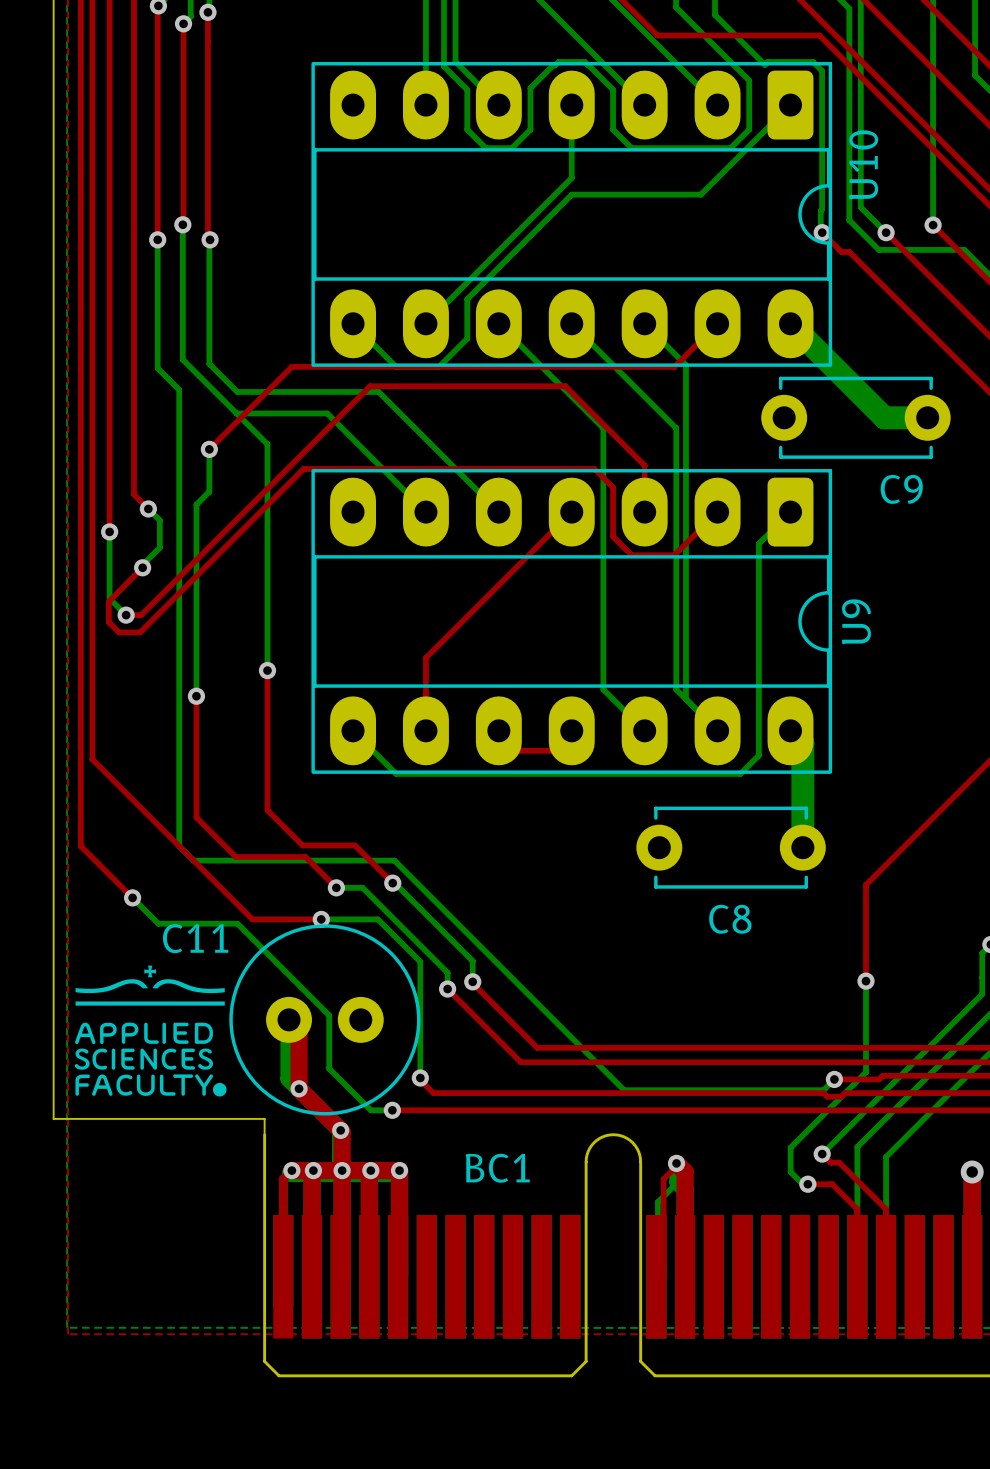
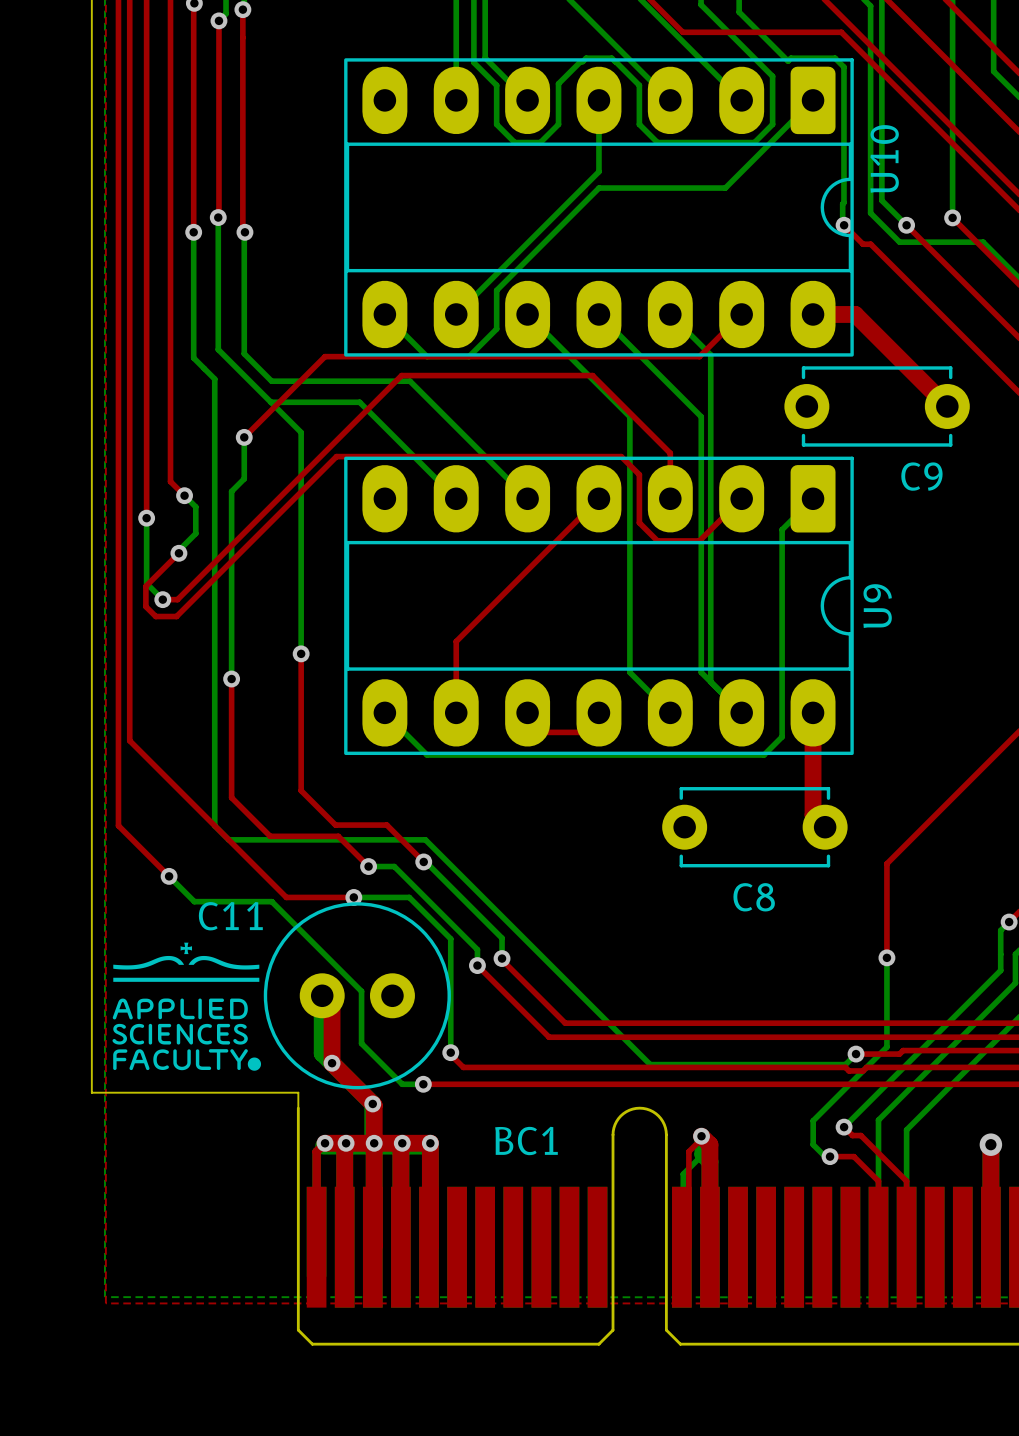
top track: none -> (813, 314) (855, 314) (947, 406)
bottom track: (790, 323) (884, 417) (927, 417) -> none
top track: none -> (813, 712) (813, 815) (825, 827)
bottom track: (790, 730) (802, 743) (802, 847) -> none

